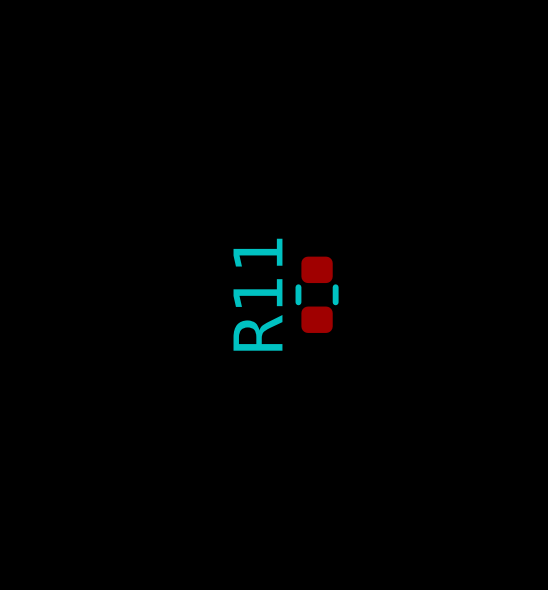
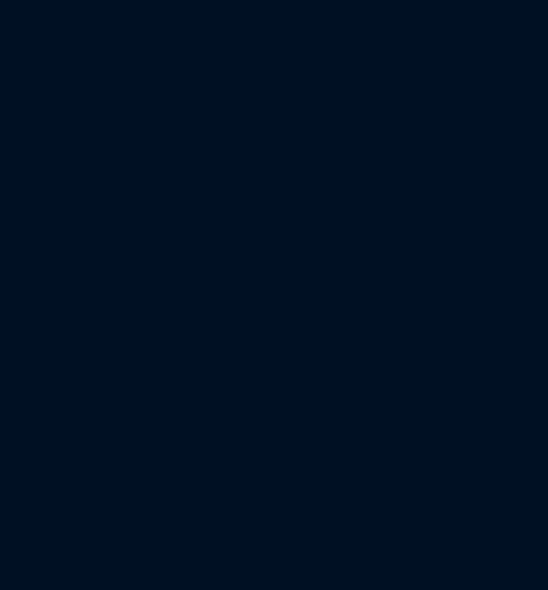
R11: (317, 294) -> none

